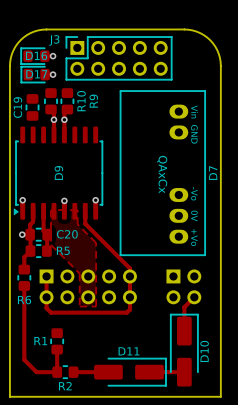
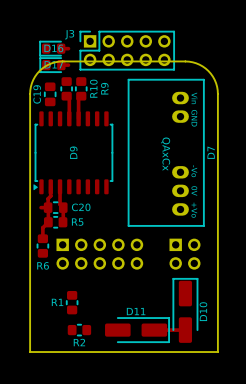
via: (53, 56) -> none
via: (53, 74) -> none
board edge: (9, 107) (10, 61) (13, 50) (27, 35) (46, 29) (184, 29) (200, 33) (212, 43) (219, 57) (220, 107) -> (30, 93) (33, 79) (39, 70) (51, 63) (62, 61) (192, 62) (202, 66) (210, 73) (216, 83) (217, 93)
via: (53, 119) -> none
via: (64, 119) -> none
via: (22, 200) -> none
via: (64, 200) -> none
via: (95, 200) -> none
zone outline: (50, 210) (50, 244) (79, 273) (79, 306) (96, 306) (96, 242) (77, 224) (77, 210) (50, 210) -> none
track: (85, 211) (85, 223) (129, 268) (129, 309) (126, 312) (50, 312) (46, 308) (46, 276) -> none
via: (22, 234) -> none
track: (24, 285) (24, 359) (36, 372) (57, 372) (57, 351) -> none
track: (194, 297) (184, 307) (184, 331) -> none
track: (73, 372) (108, 372) -> none

